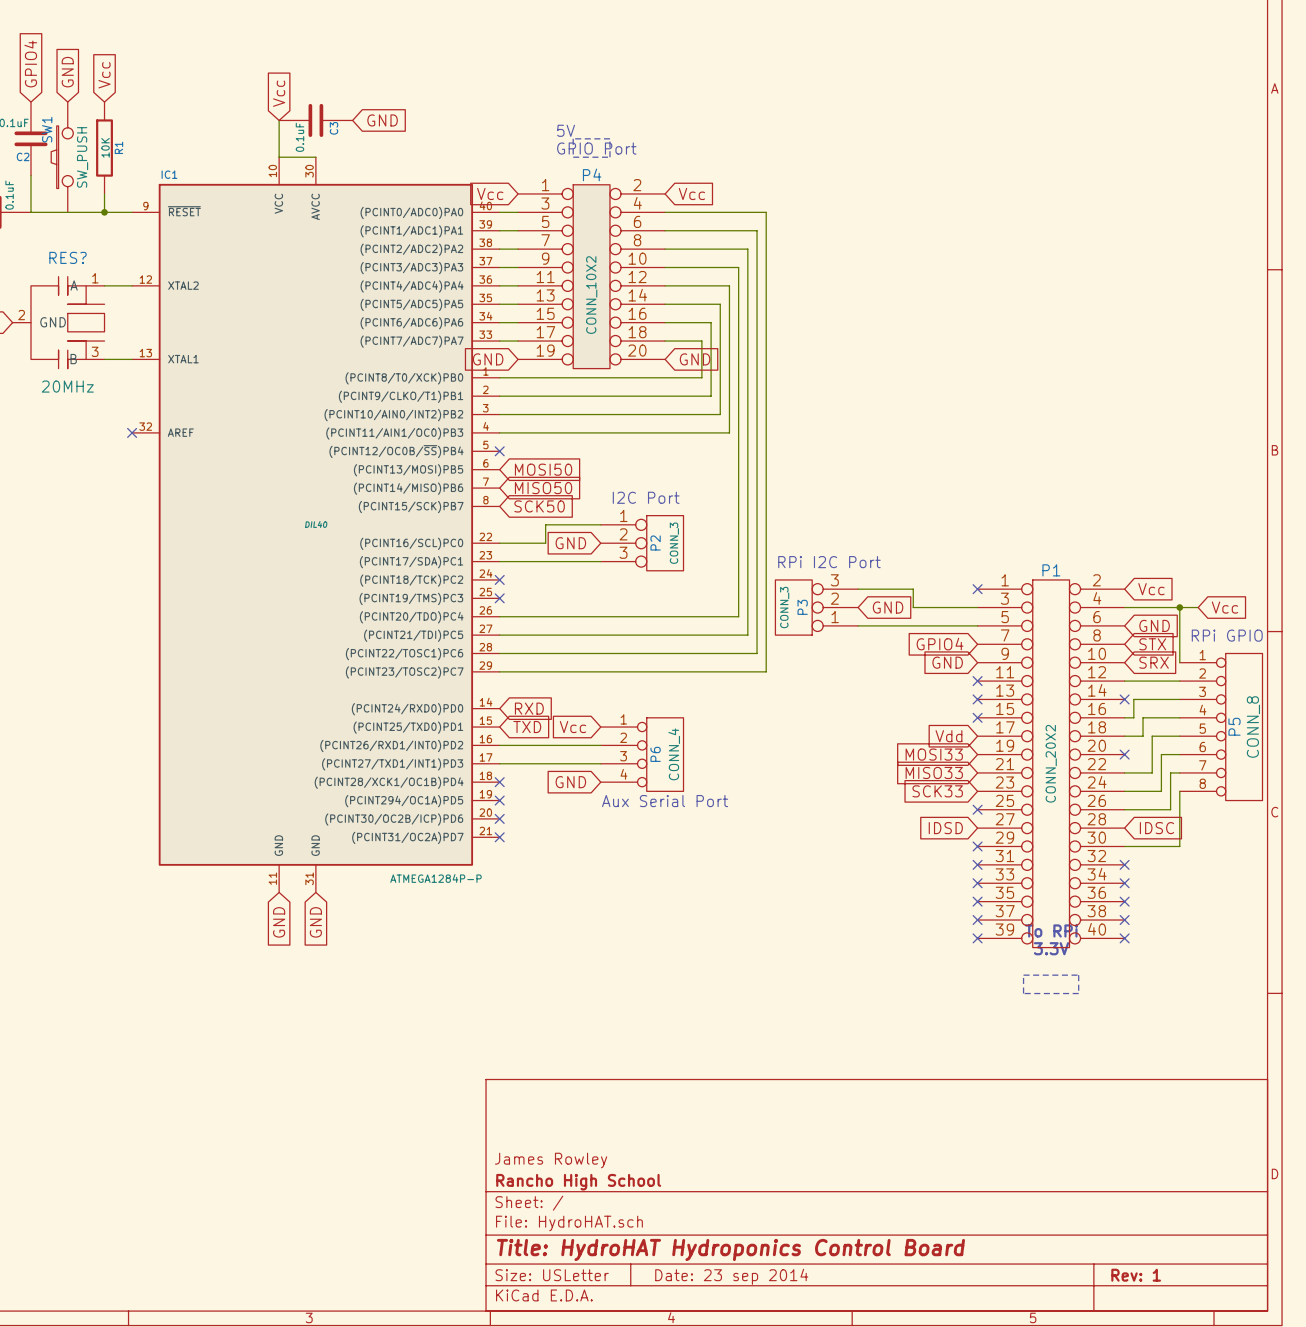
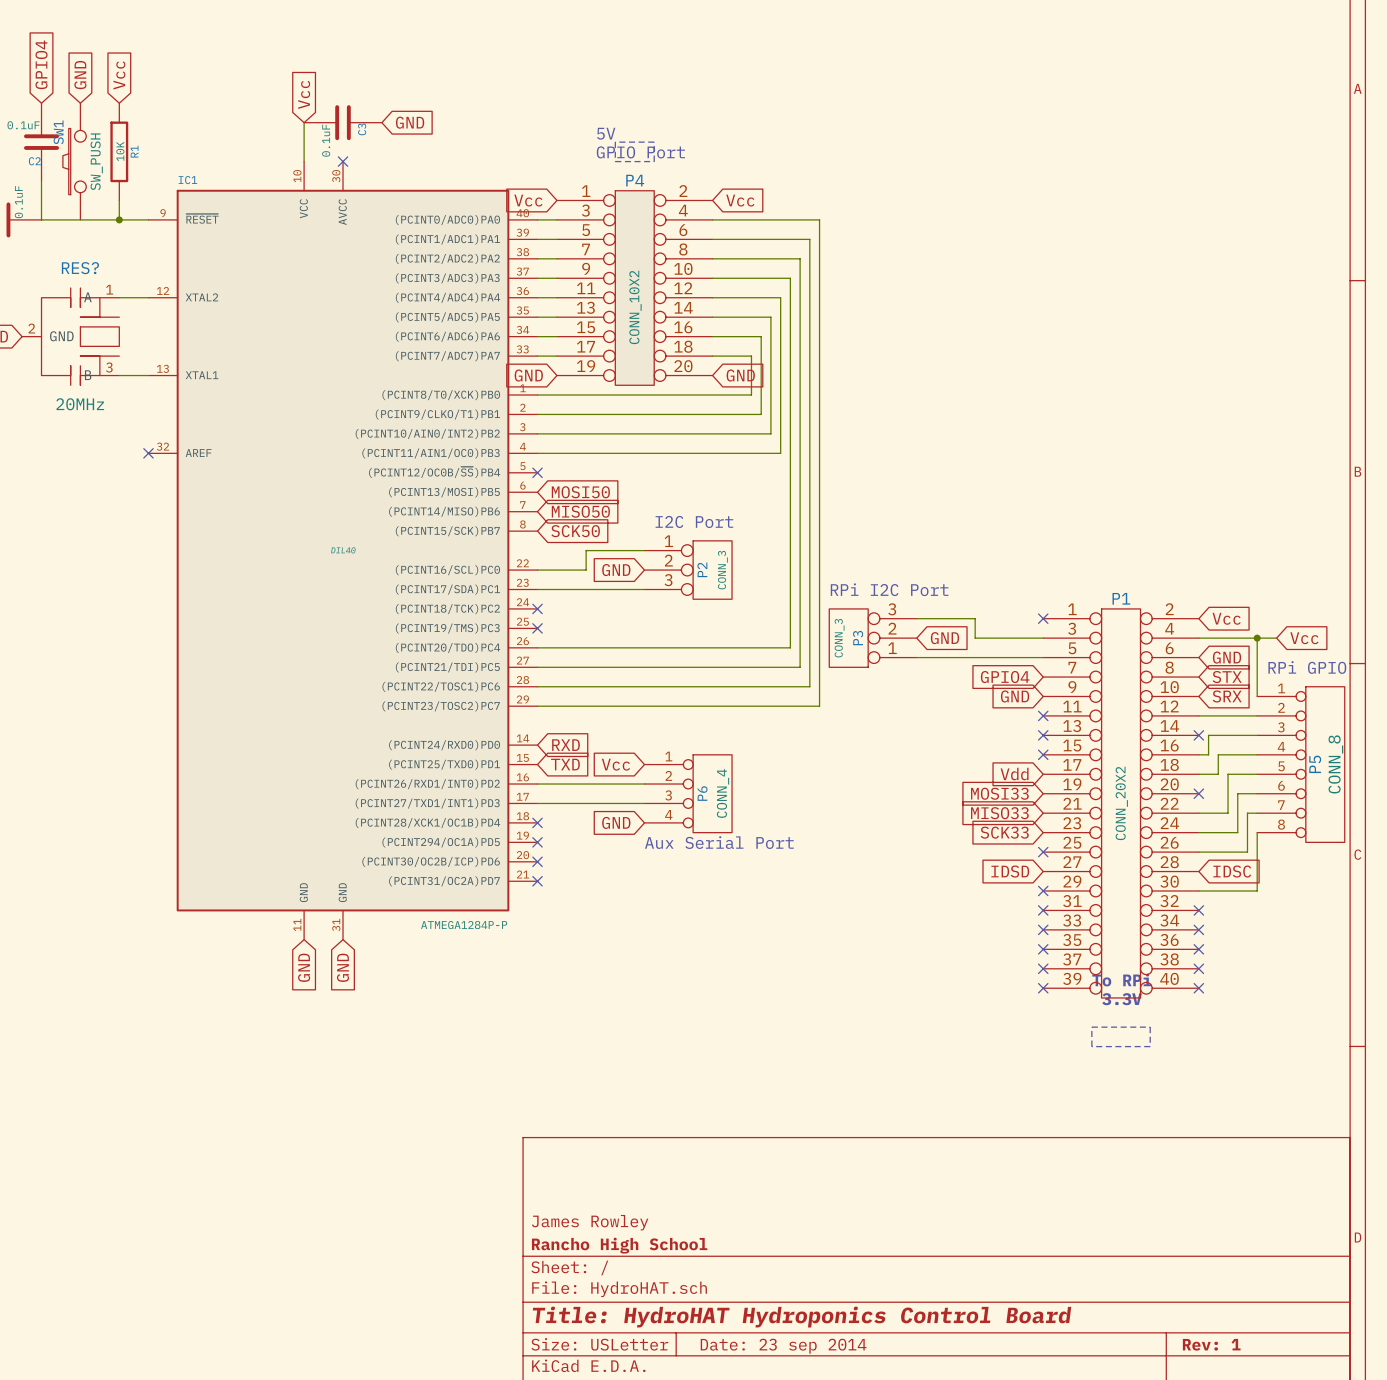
wire: (279, 157) (315, 157) -> none
no-connect mark: none -> (343, 161)

